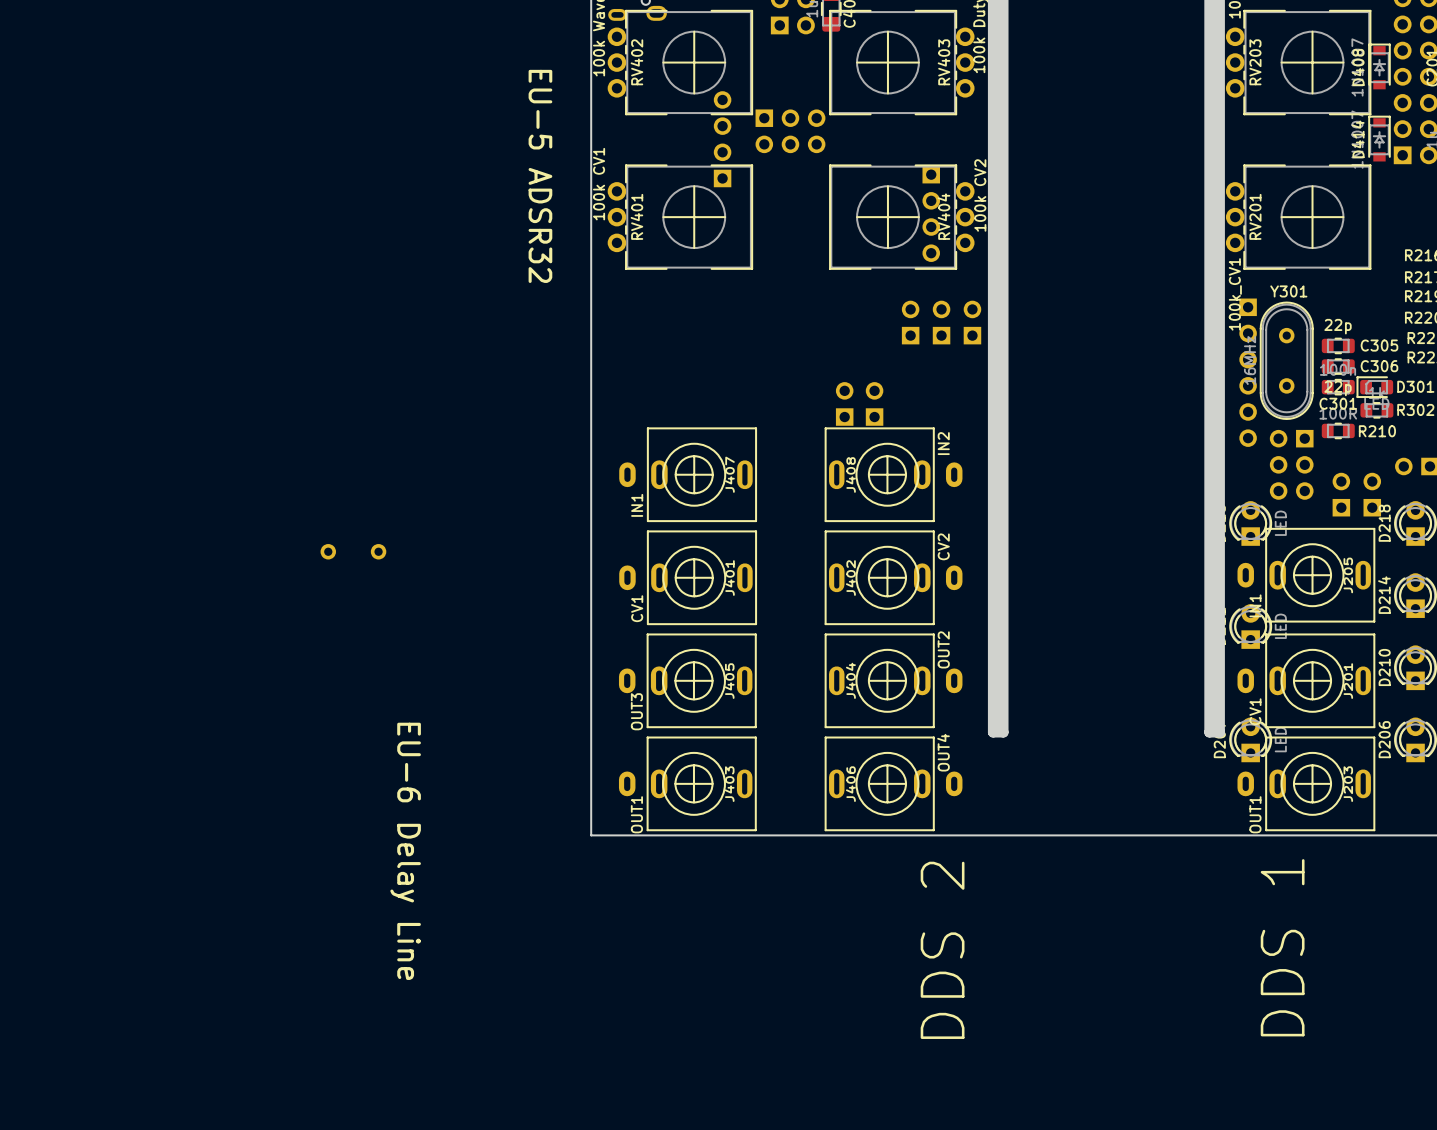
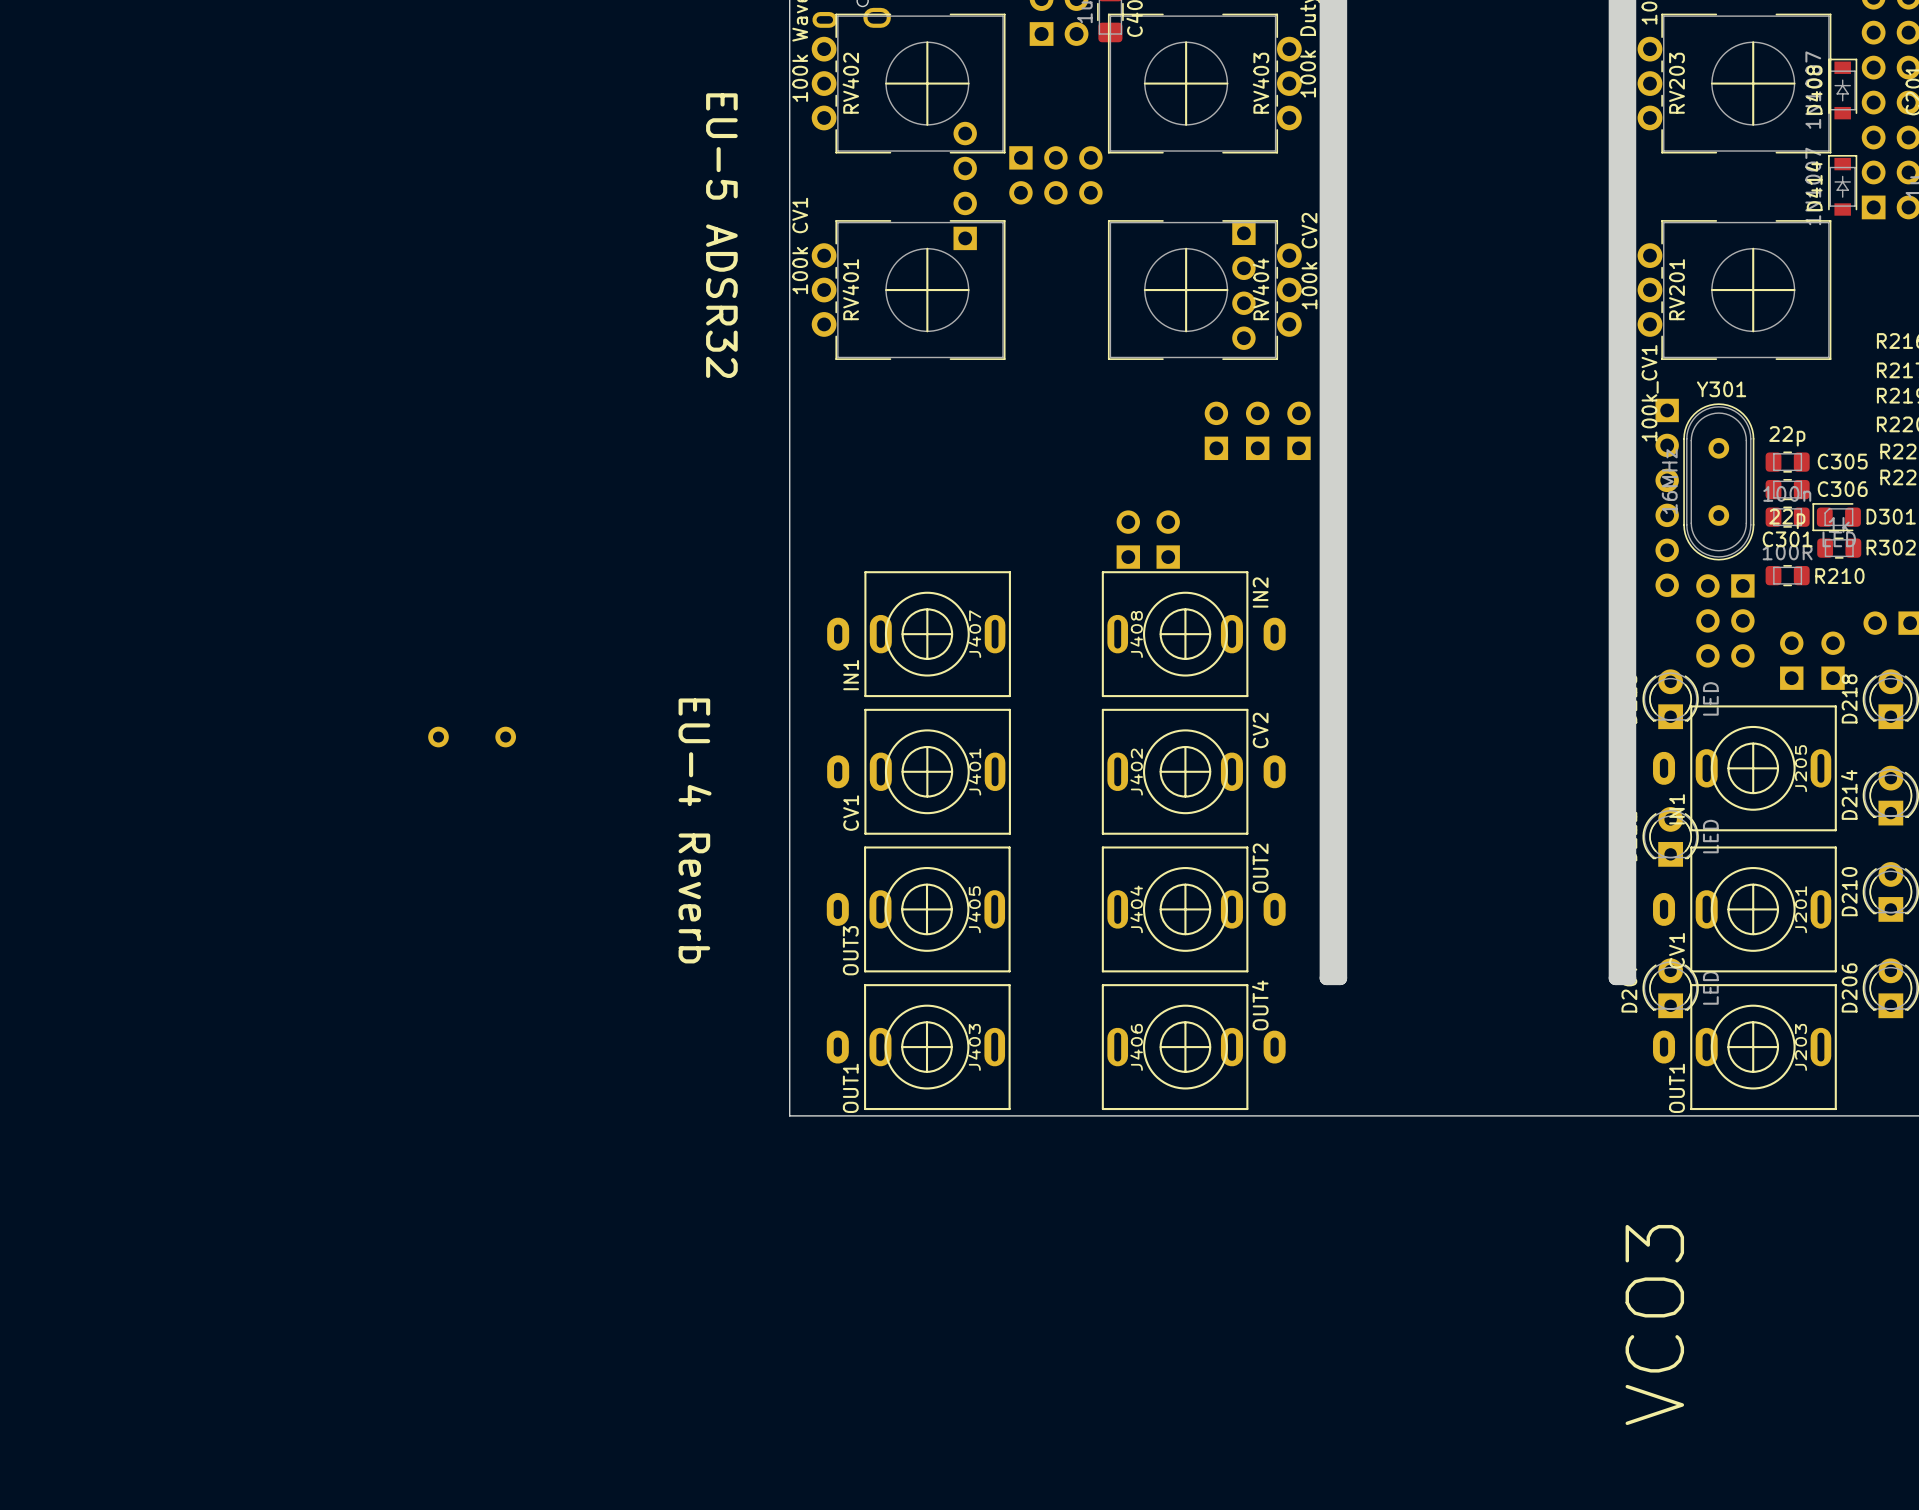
text: none -> EU-4 Reverb (695, 830)
text: EU-6 Delay Line (405, 851) -> none
text: DDS 1 (1282, 947) -> none
text: DDS 2 (942, 950) -> none
text: none -> VCO3 (1654, 1324)

